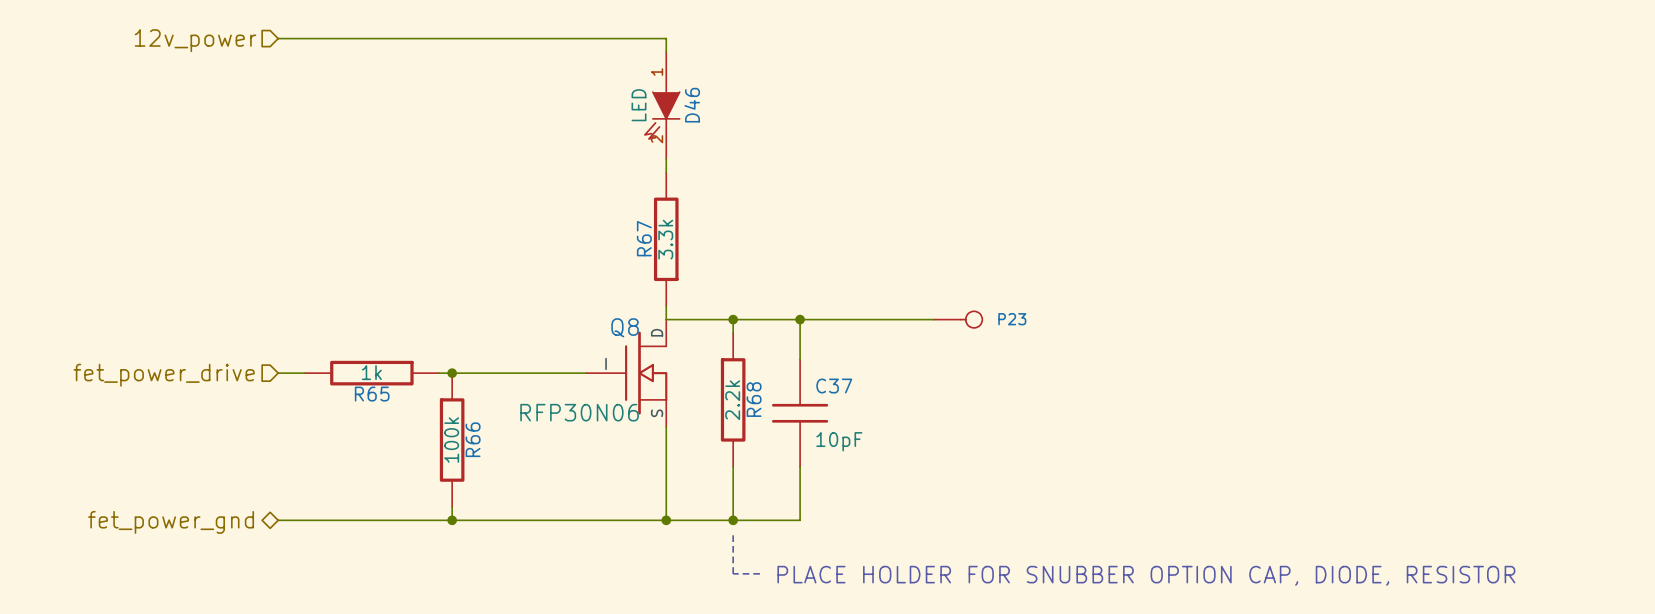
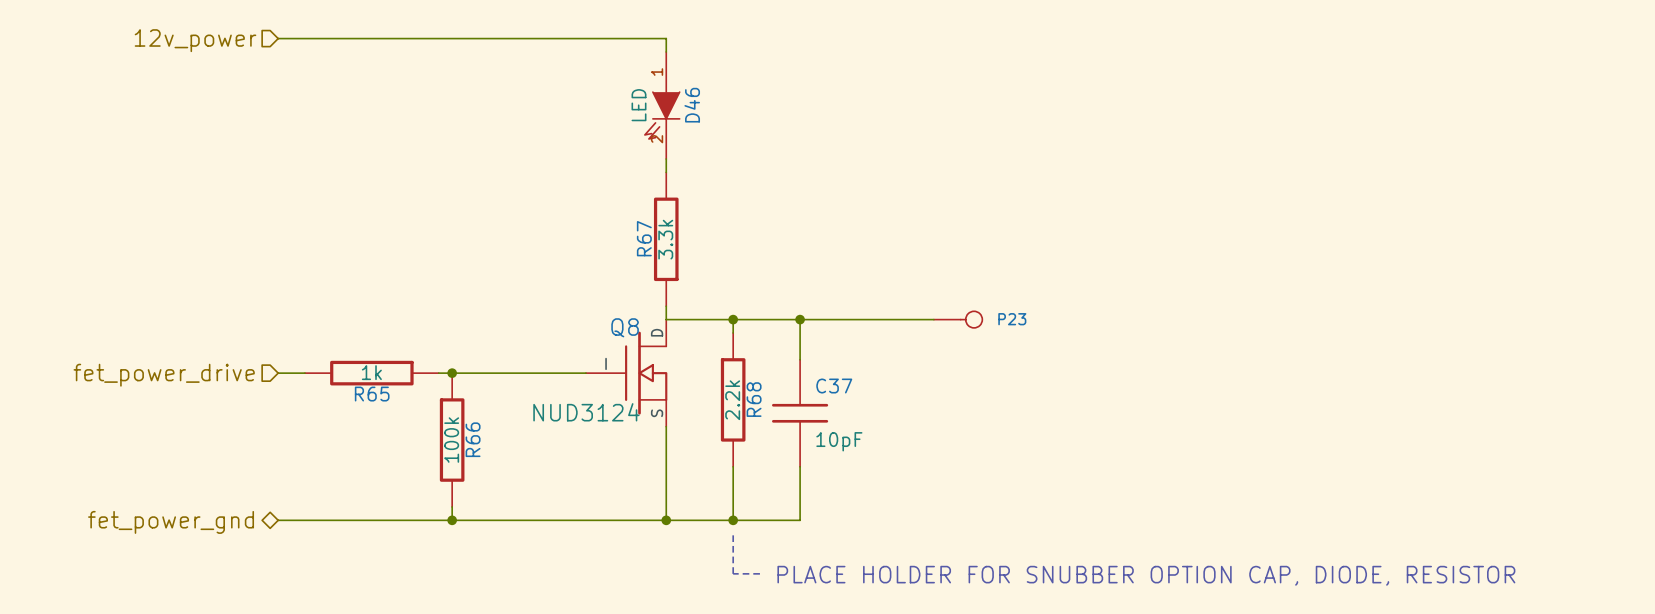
Q8 value: RFP30N06 (579, 412) -> NUD3124 (586, 412)

